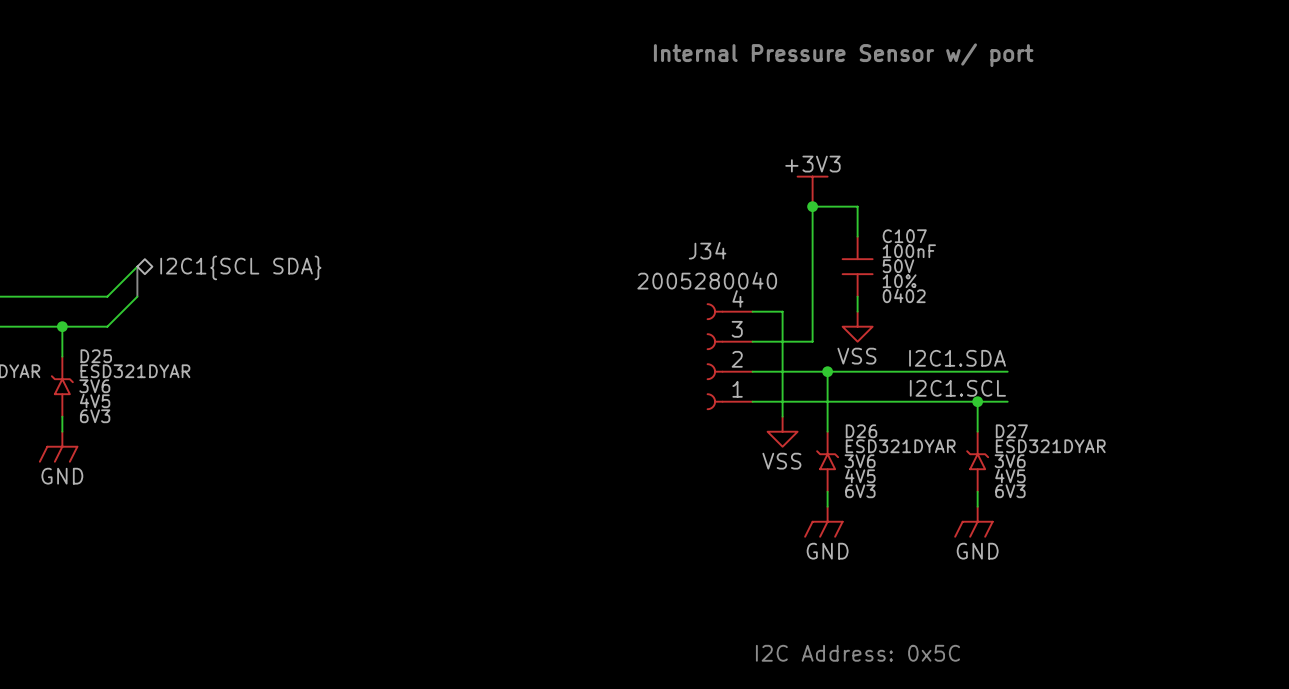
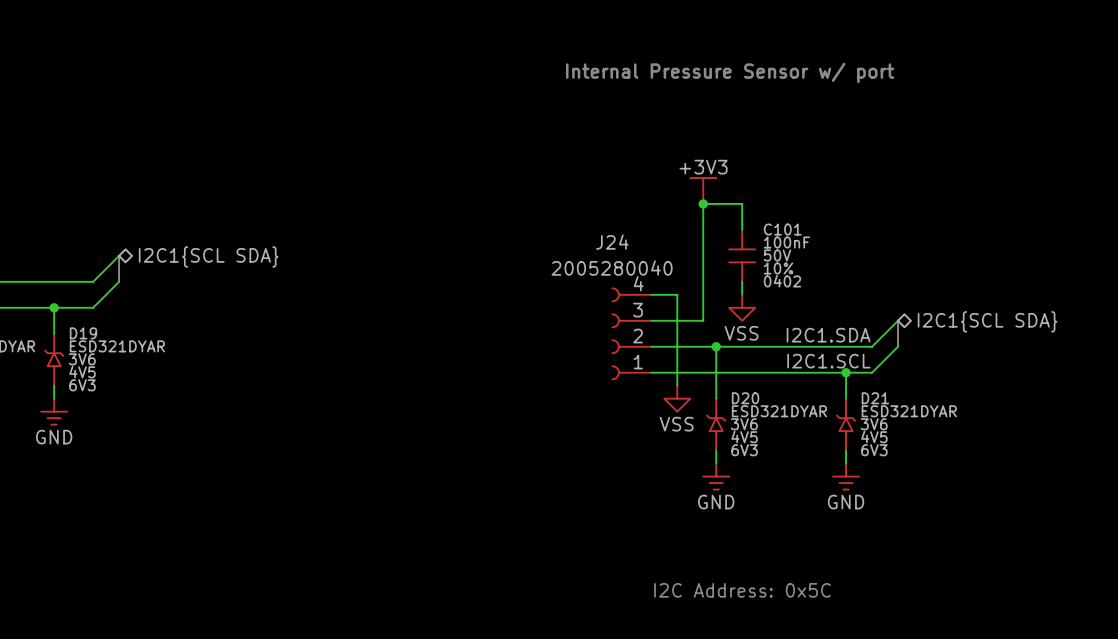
C107 name: C107 (904, 236) -> C101 (782, 229)
J34 name: J34 (707, 250) -> J24 (612, 242)
wire: none -> (897, 320) (872, 346)
bus: none -> (897, 320) (897, 346)
hierarchical label: none -> I2C1{SCL SDA} (987, 321)
D25 name: D25 (96, 356) -> D19 (83, 333)
wire: none -> (897, 346) (872, 372)
power symbol shape: [39, 431, 78, 462] -> [41, 398, 68, 425]
D26 name: D26 (861, 431) -> D20 (745, 398)
D27 name: D27 (1011, 431) -> D21 (875, 398)
power symbol shape: [805, 506, 843, 537] -> [703, 463, 730, 490]
power symbol shape: [955, 506, 993, 537] -> [833, 463, 860, 490]

